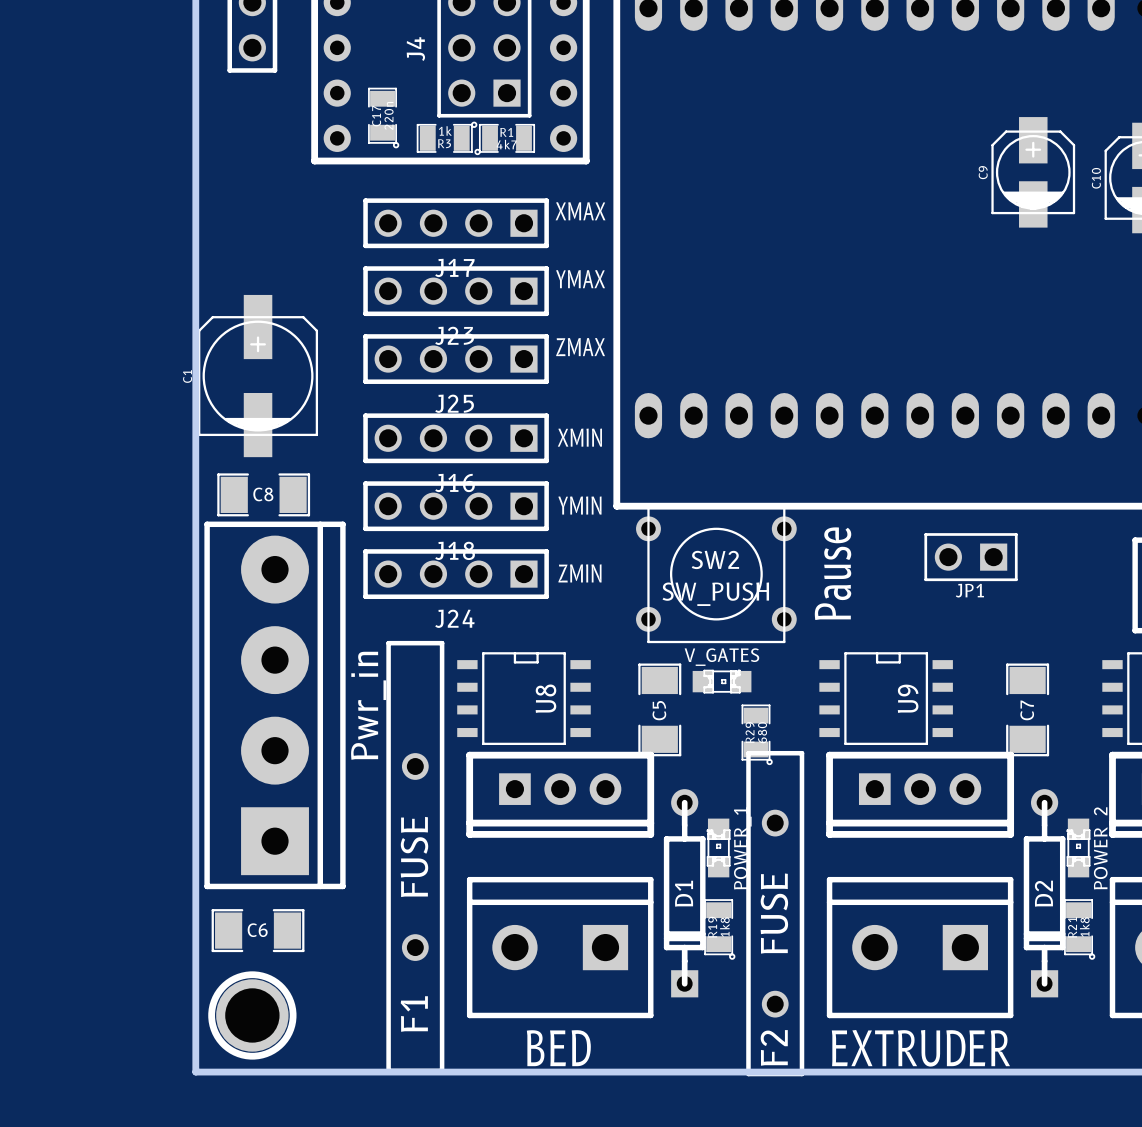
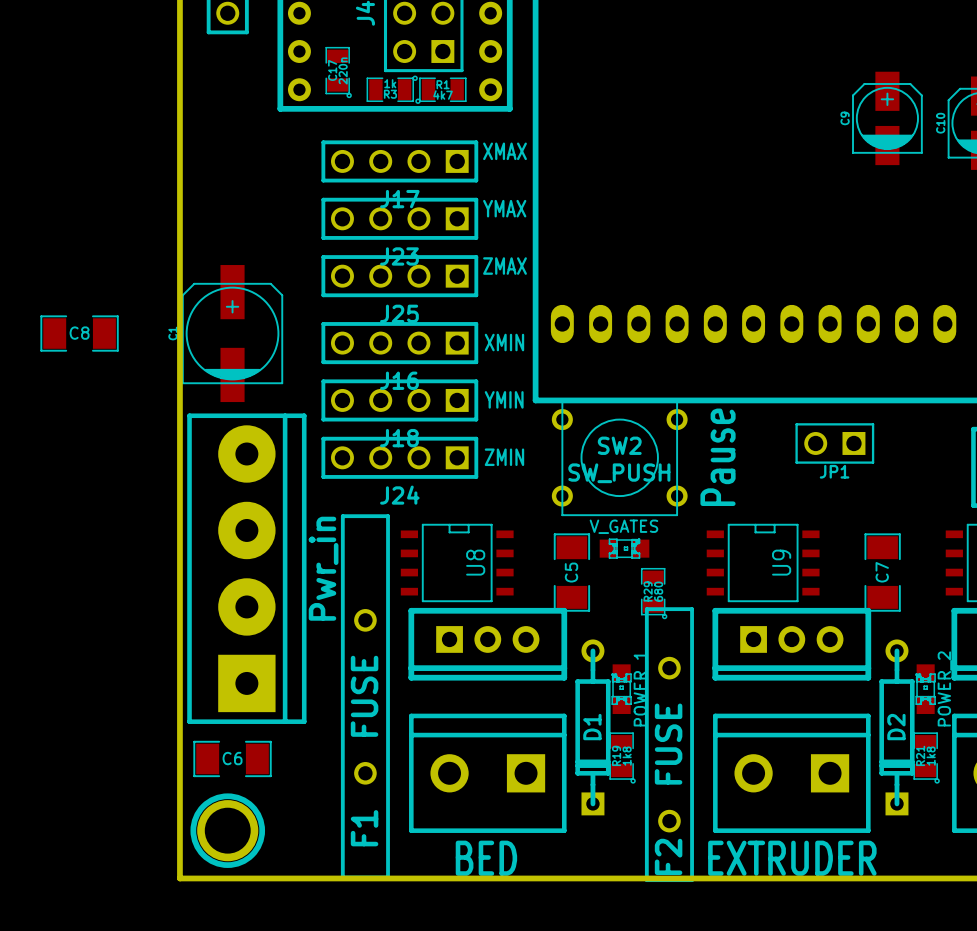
C1 position: (258, 376) -> (232, 333)
C8 position: (263, 494) -> (79, 333)

